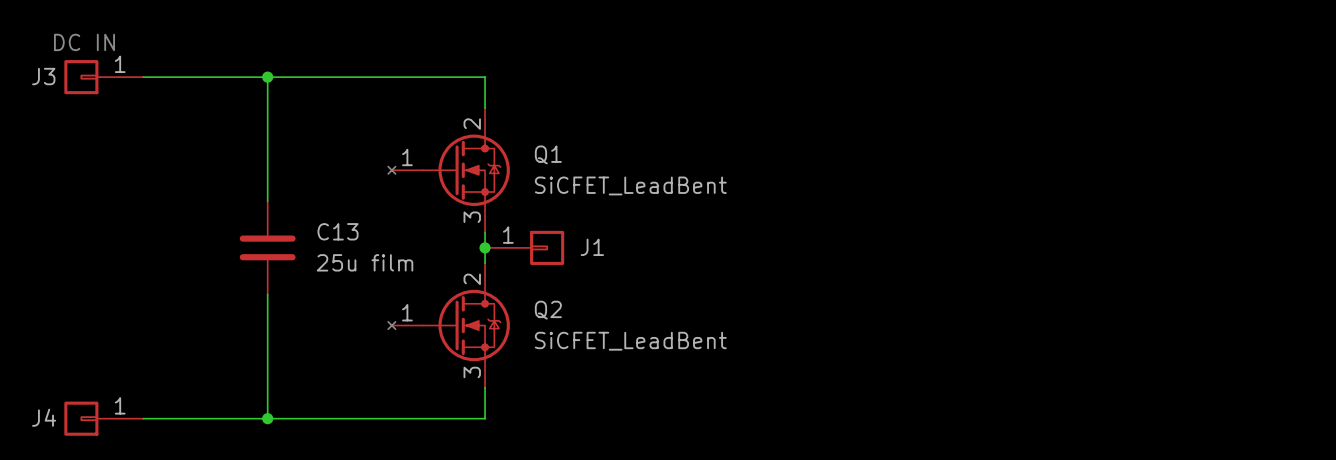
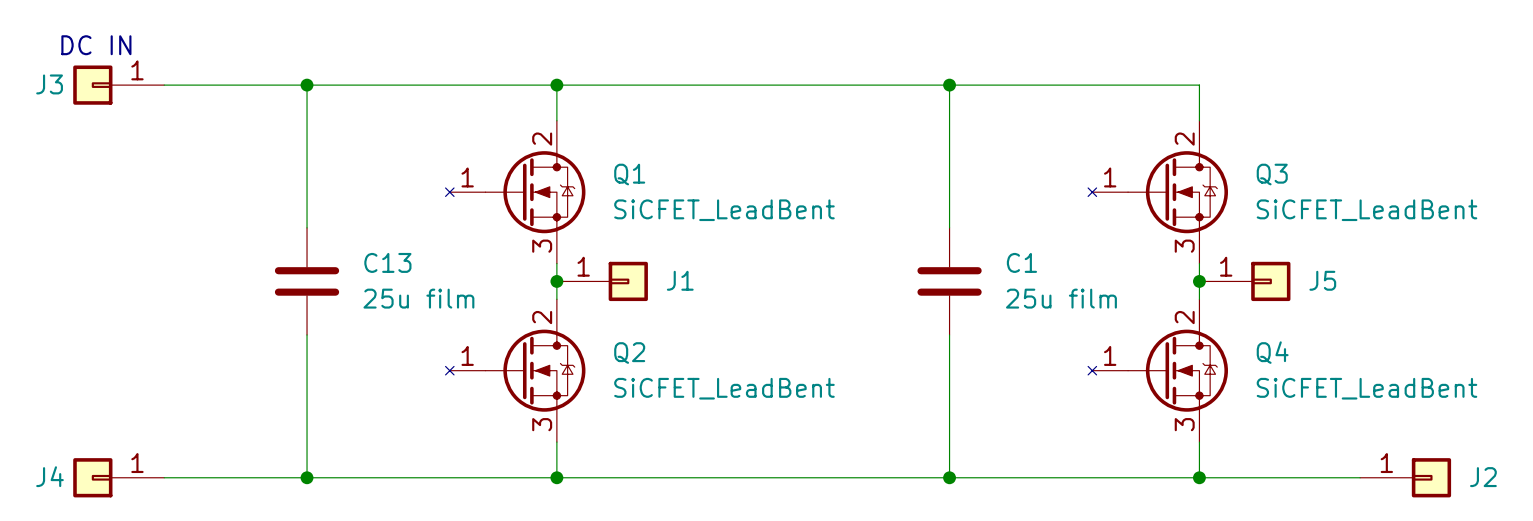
wire: none -> (556, 85) (1199, 85) (1199, 120)
junction: none -> (556, 85)
wire: none -> (949, 85) (949, 227)
junction: none -> (949, 85)
Q3: none -> SiCFET_LeadBent (1158, 192)
wire: none -> (1199, 263) (1199, 299)
C1: none -> 25u film (949, 281)
junction: none -> (1199, 281)
J5: none -> (1244, 281)
wire: none -> (949, 334) (949, 477)
Q4: none -> SiCFET_LeadBent (1158, 370)
wire: none -> (1199, 442) (1199, 477)
wire: none -> (556, 477) (1360, 477)
junction: none -> (556, 477)
junction: none -> (949, 477)
junction: none -> (1199, 477)
J2: none -> (1405, 477)

